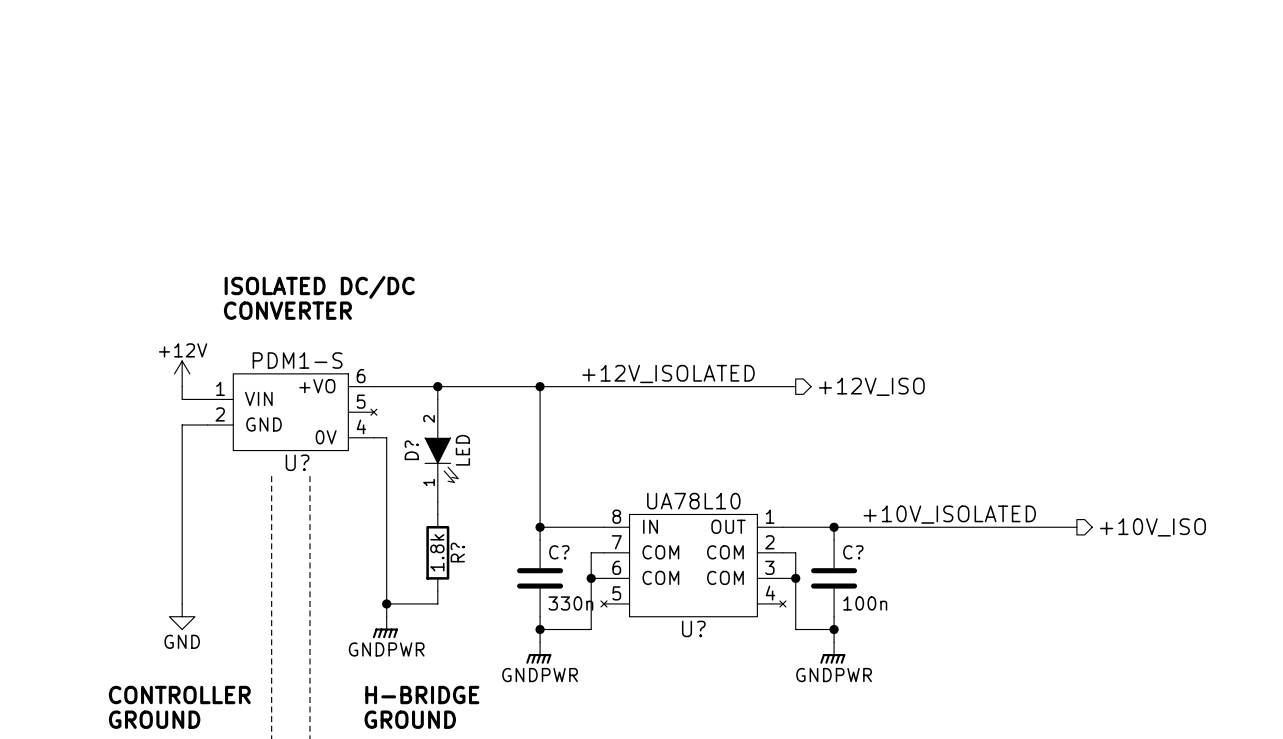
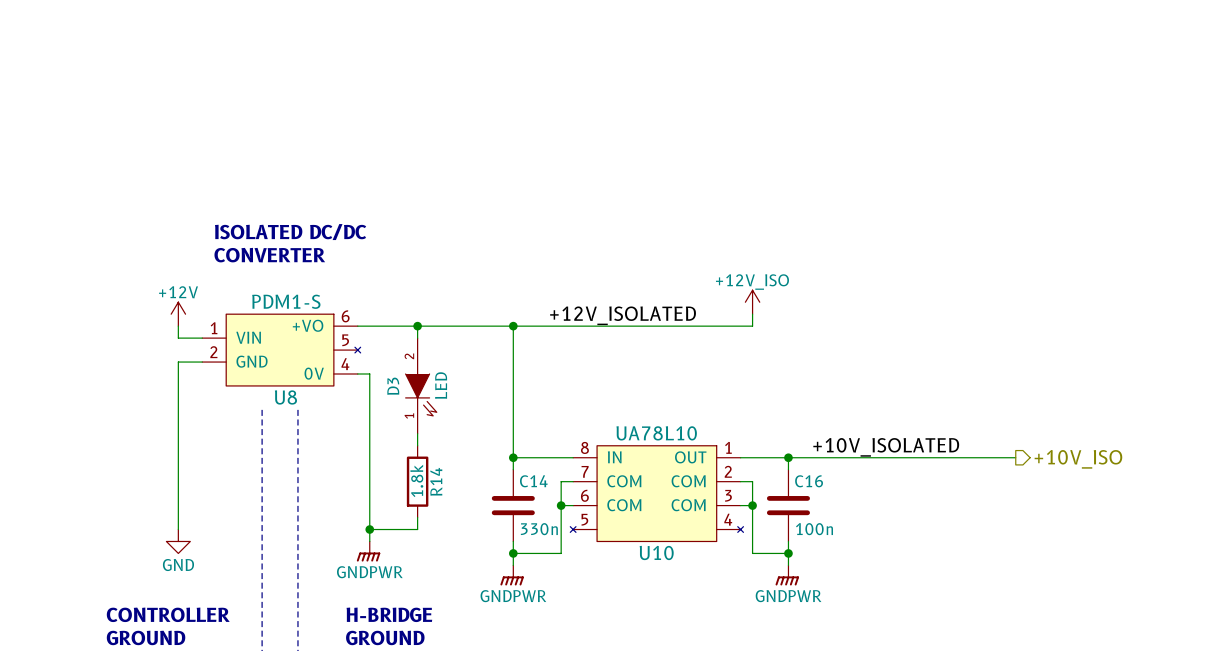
power symbol: none -> +12V_ISO (752, 302)
hierarchical label: +12V_ISO (871, 386) -> none
D? name: D? (411, 450) -> D3 (393, 386)
U? name: U? (297, 462) -> U8 (285, 397)
R? name: R? (457, 552) -> R14 (436, 481)
C? name: C? (559, 552) -> C14 (533, 481)
C? name: C? (853, 552) -> C16 (809, 481)
U? name: U? (693, 628) -> U10 (656, 552)

